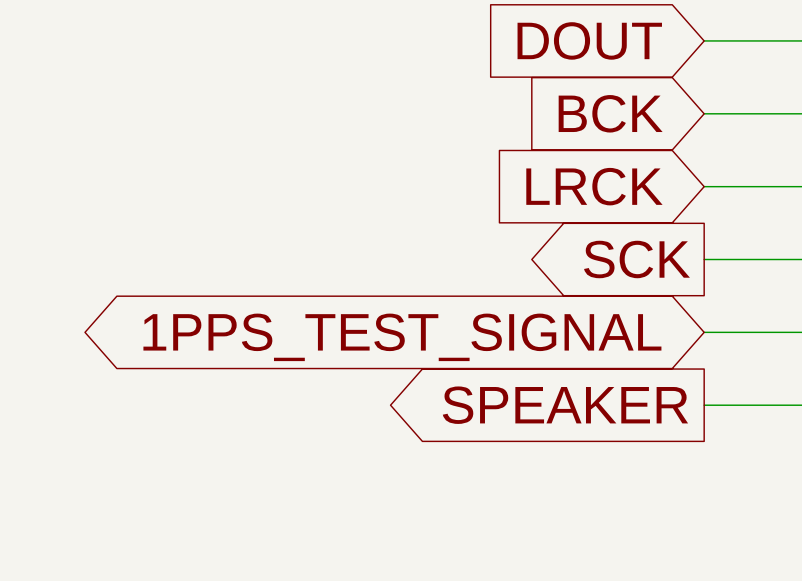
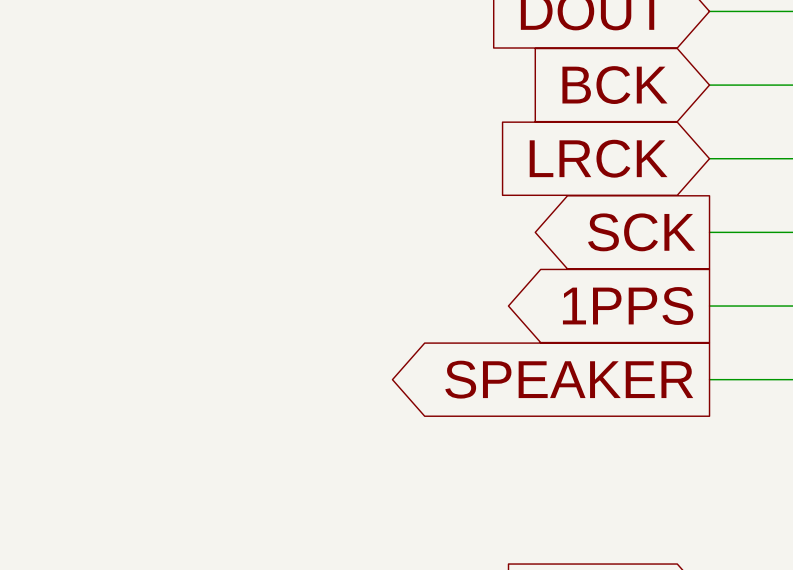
global label shape: bidirectional (402, 337) -> output (628, 306)
global label: 1PPS_TEST_SIGNAL (402, 337) -> 1PPS (628, 306)

